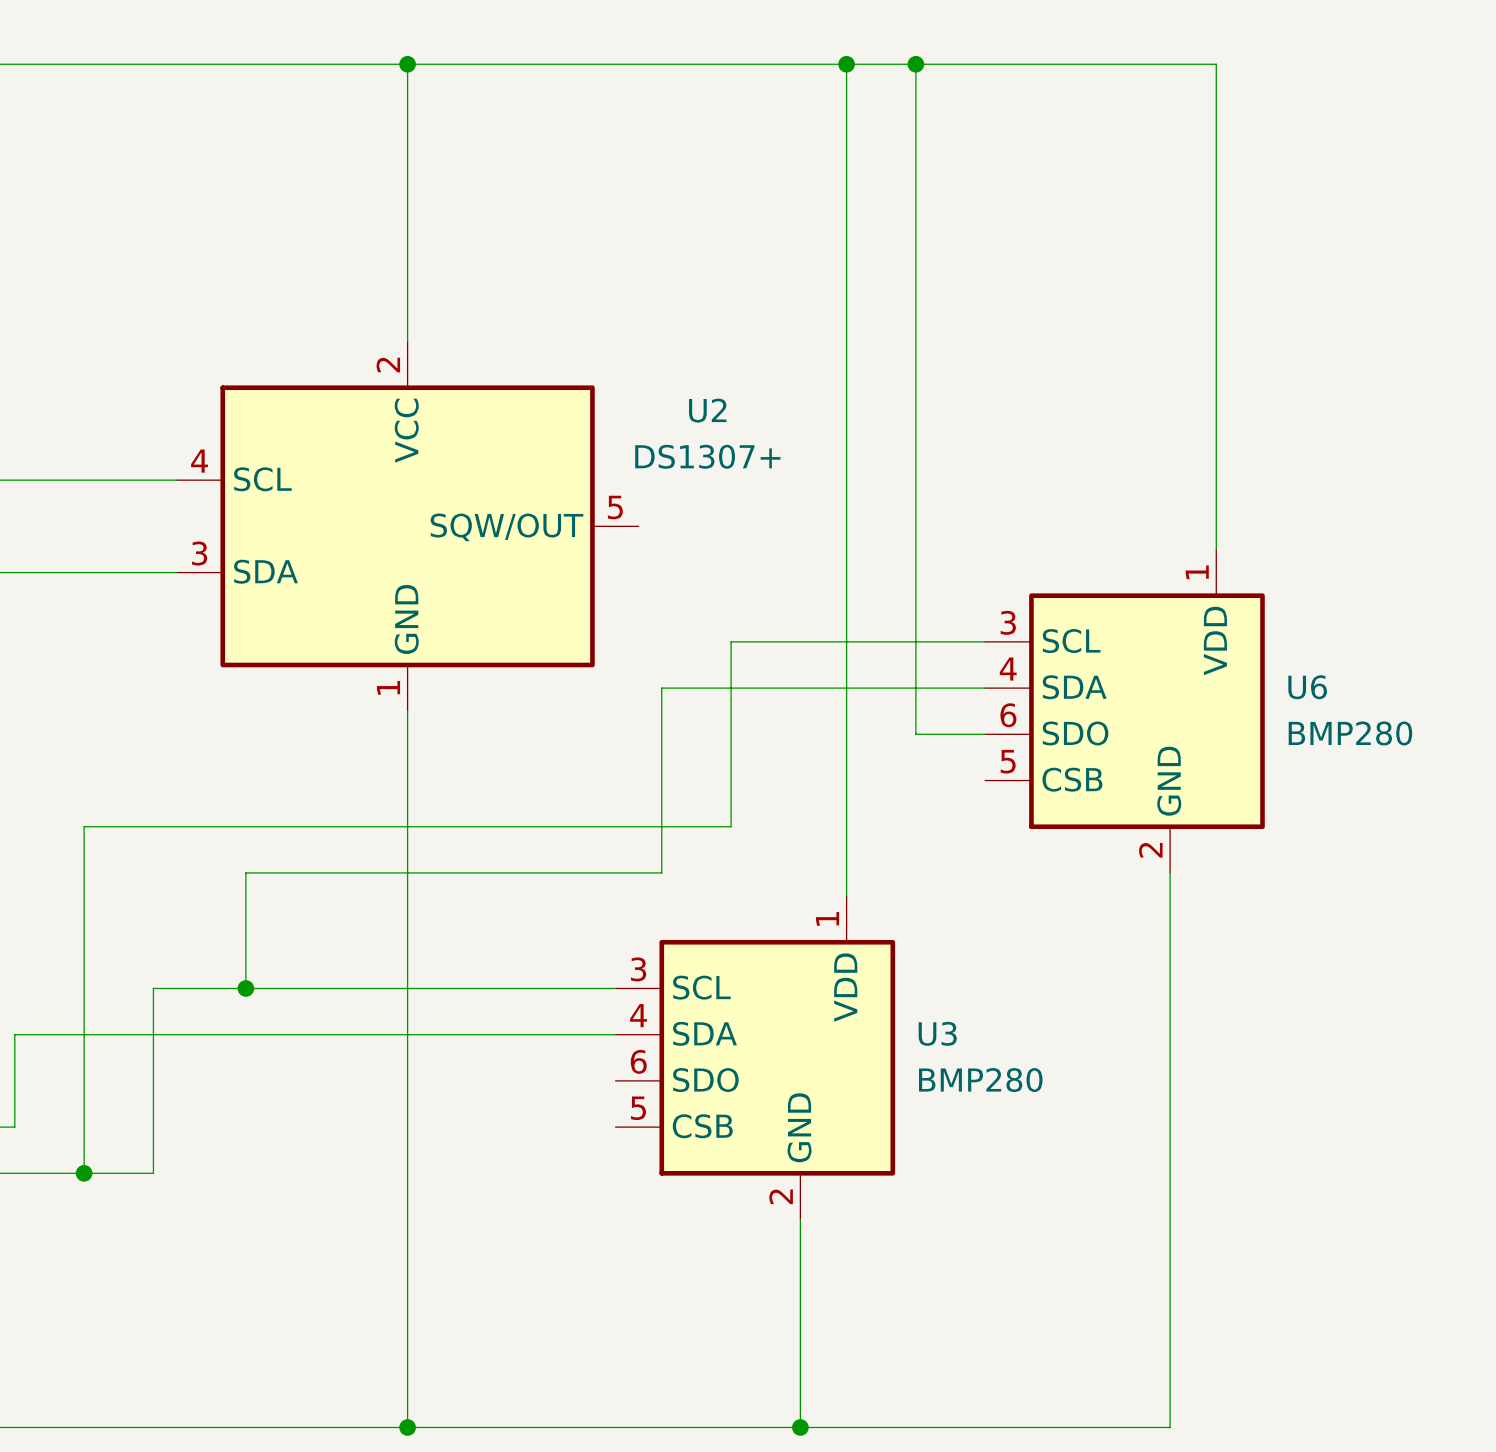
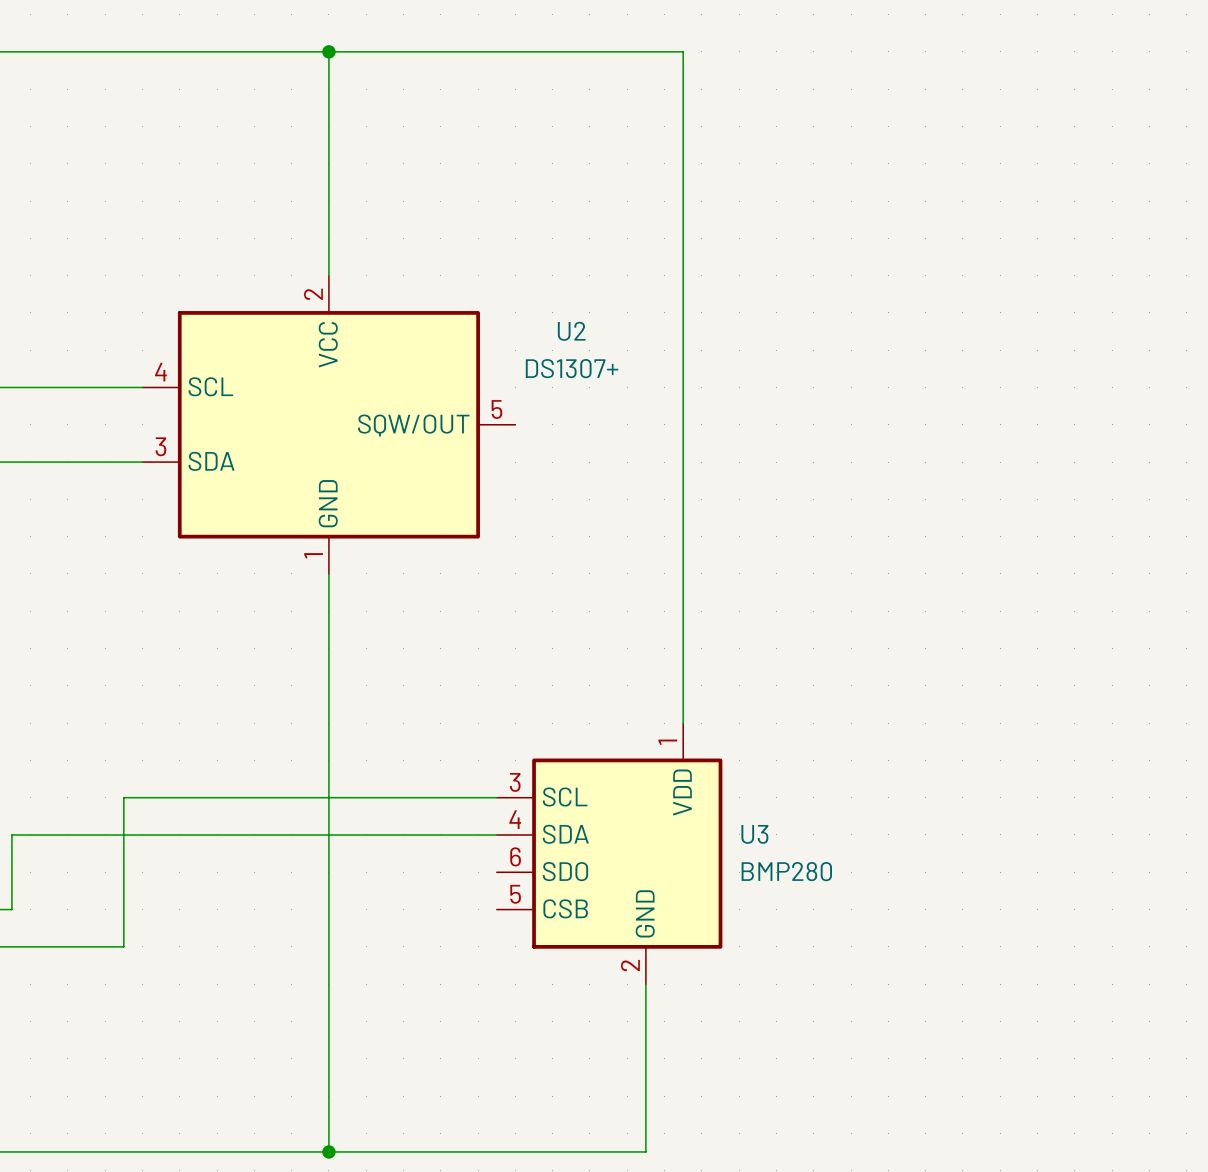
wire: (846, 64) (1216, 64) (1216, 549) -> none
junction: (846, 64) -> none
wire: (915, 64) (915, 734) (985, 734) -> none
junction: (915, 64) -> none
wire: (985, 641) (731, 641) (731, 826) (84, 826) (84, 1173) -> none
wire: (985, 688) (661, 688) (661, 872) (245, 872) (245, 988) -> none
U6: BMP280 (1125, 711) -> none
wire: (1170, 872) (1170, 1427) (800, 1427) -> none
junction: (245, 988) -> none
junction: (84, 1173) -> none
junction: (800, 1427) -> none

